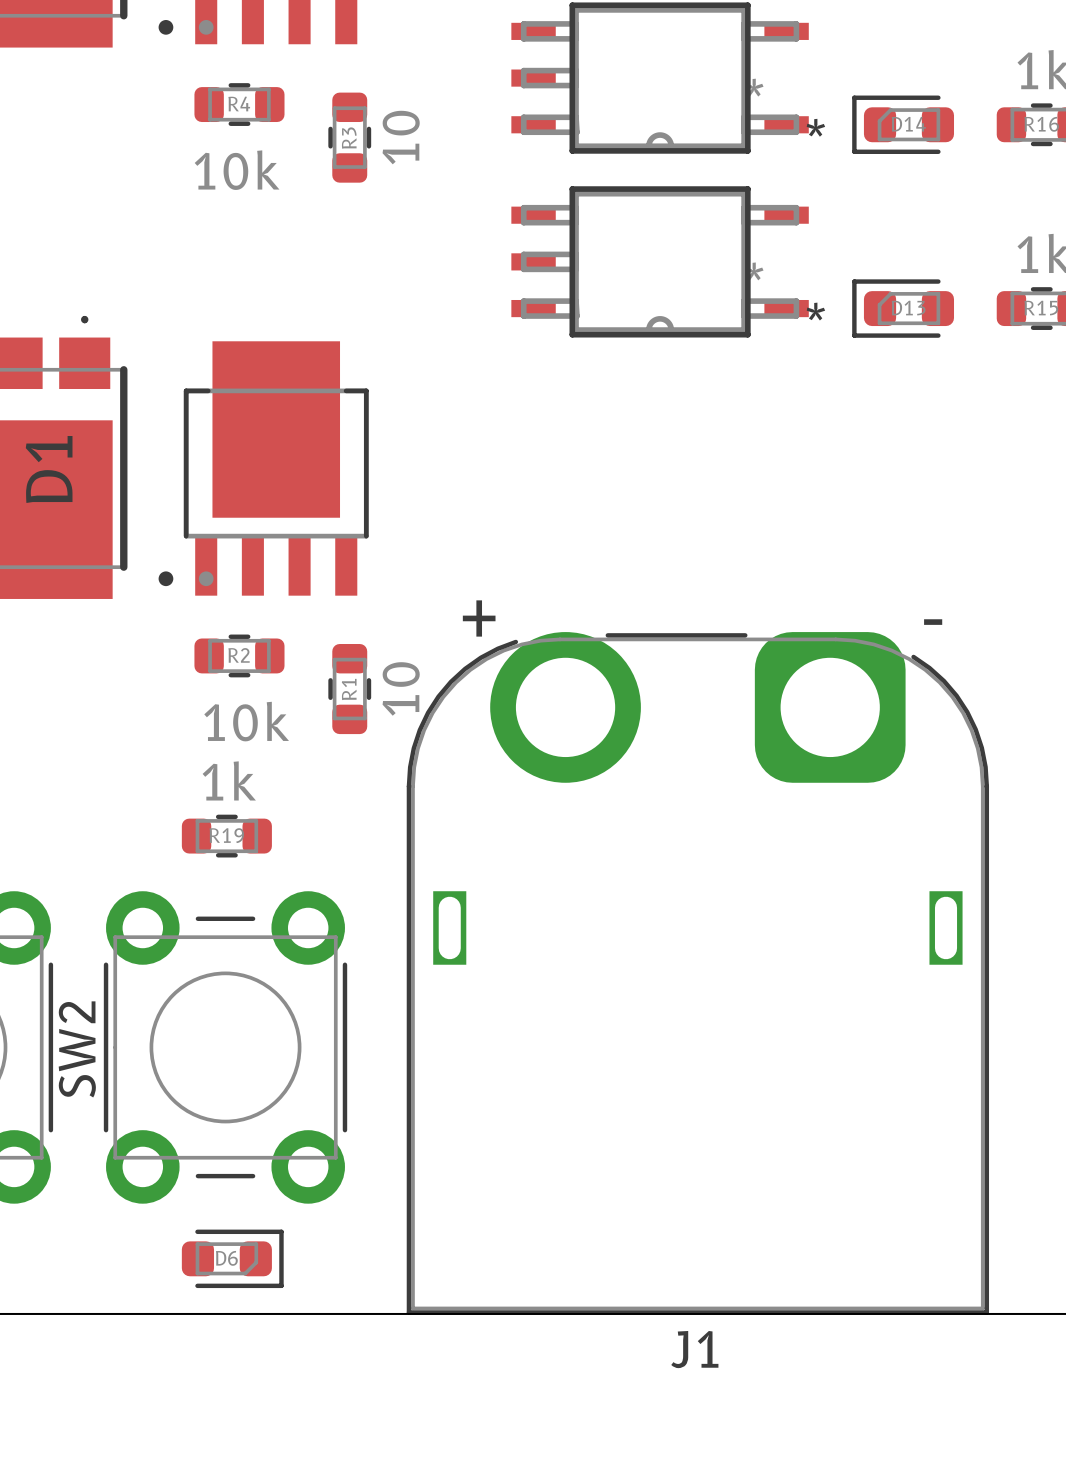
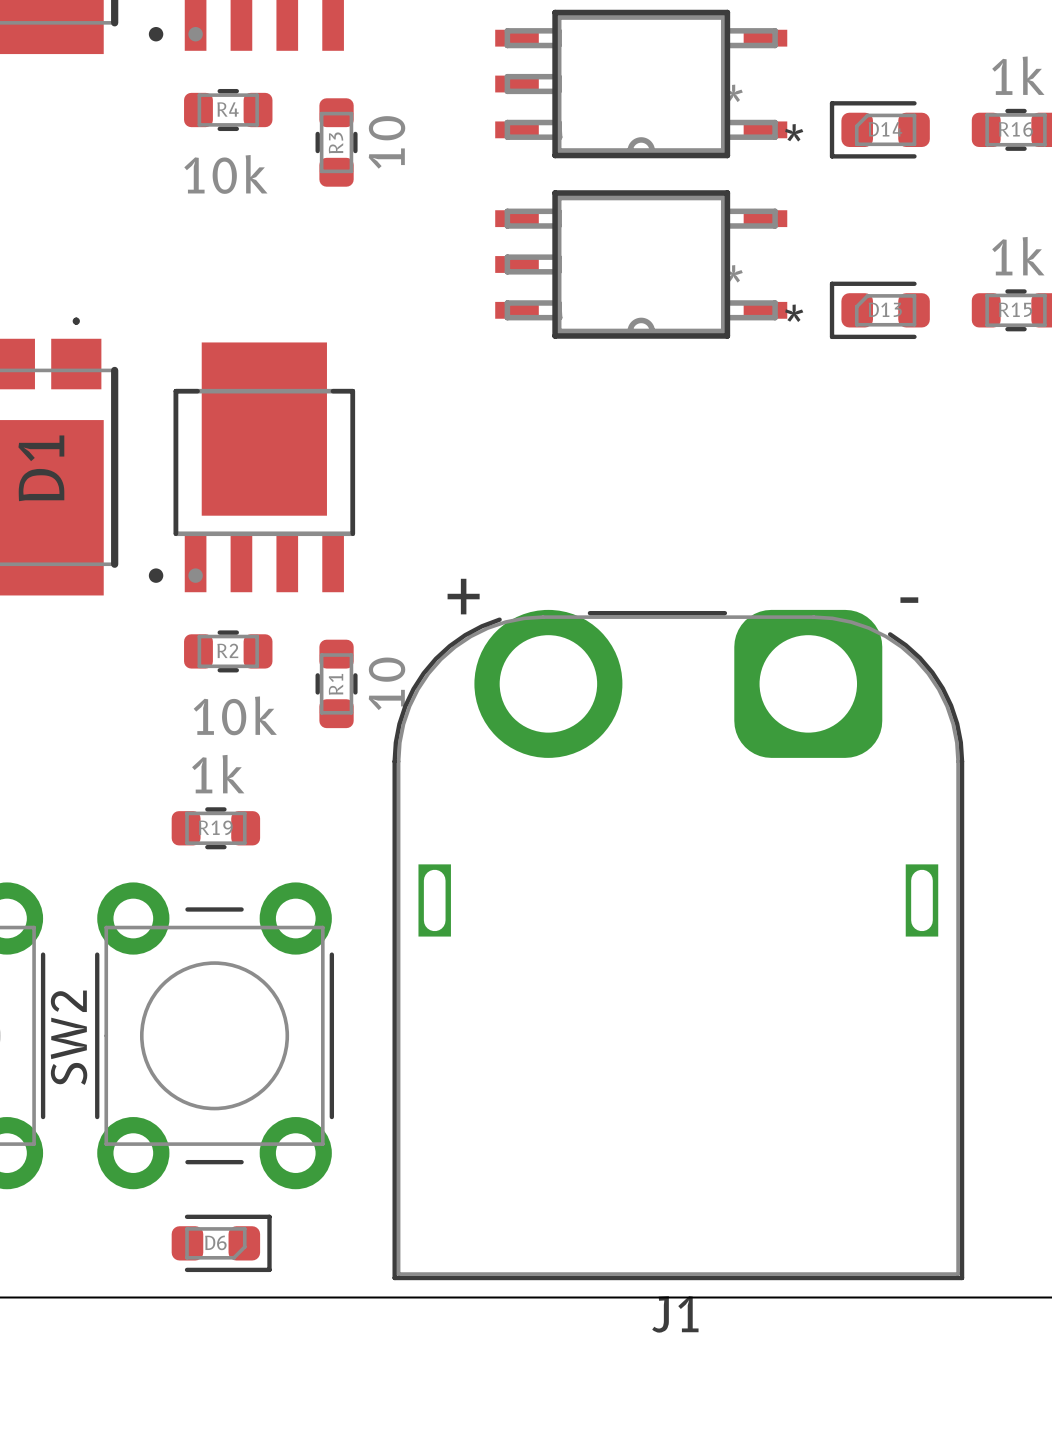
J1 position: (697, 973) -> (678, 945)

